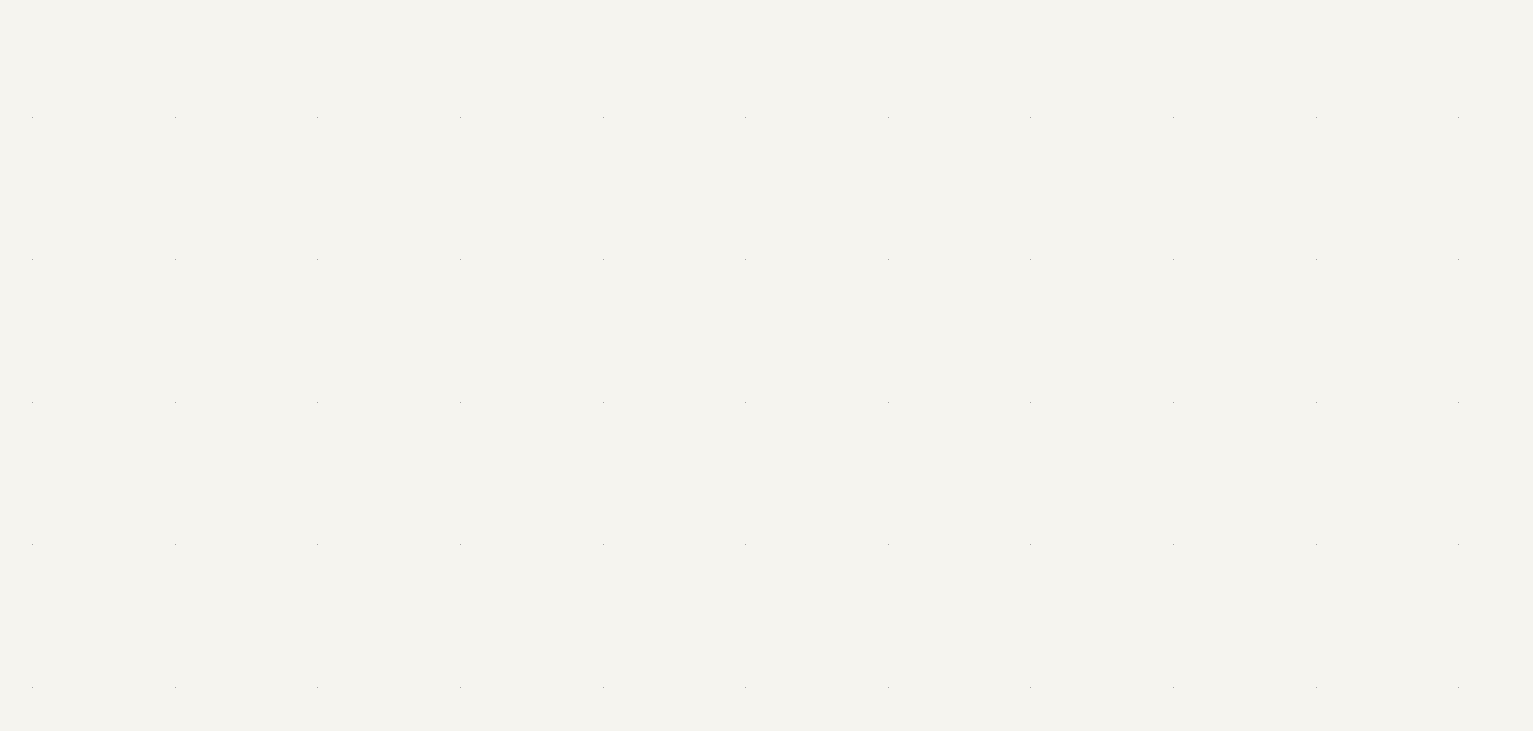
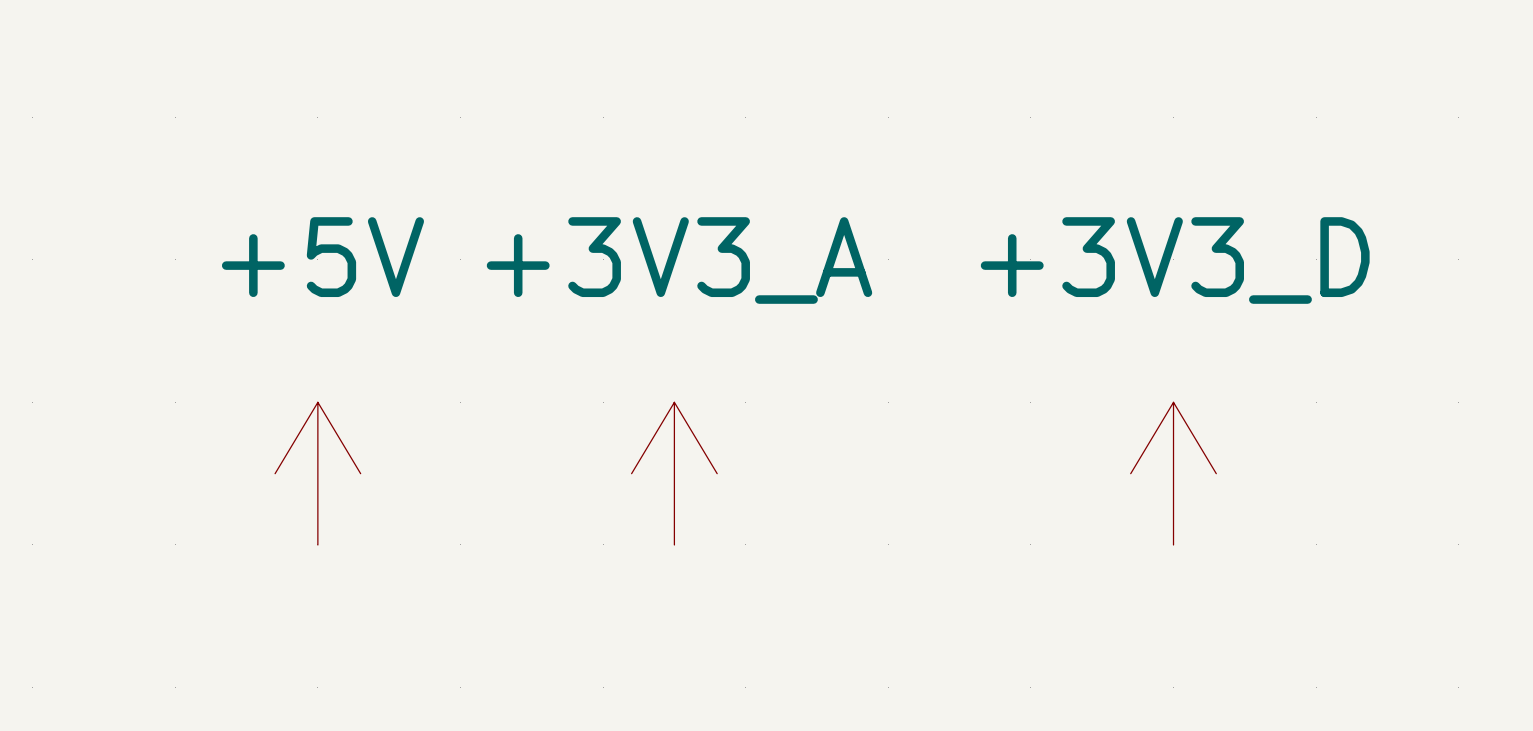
power symbol: none -> +5V (317, 473)
power symbol: none -> +3V3_A (674, 473)
power symbol: none -> +3V3_D (1173, 473)

